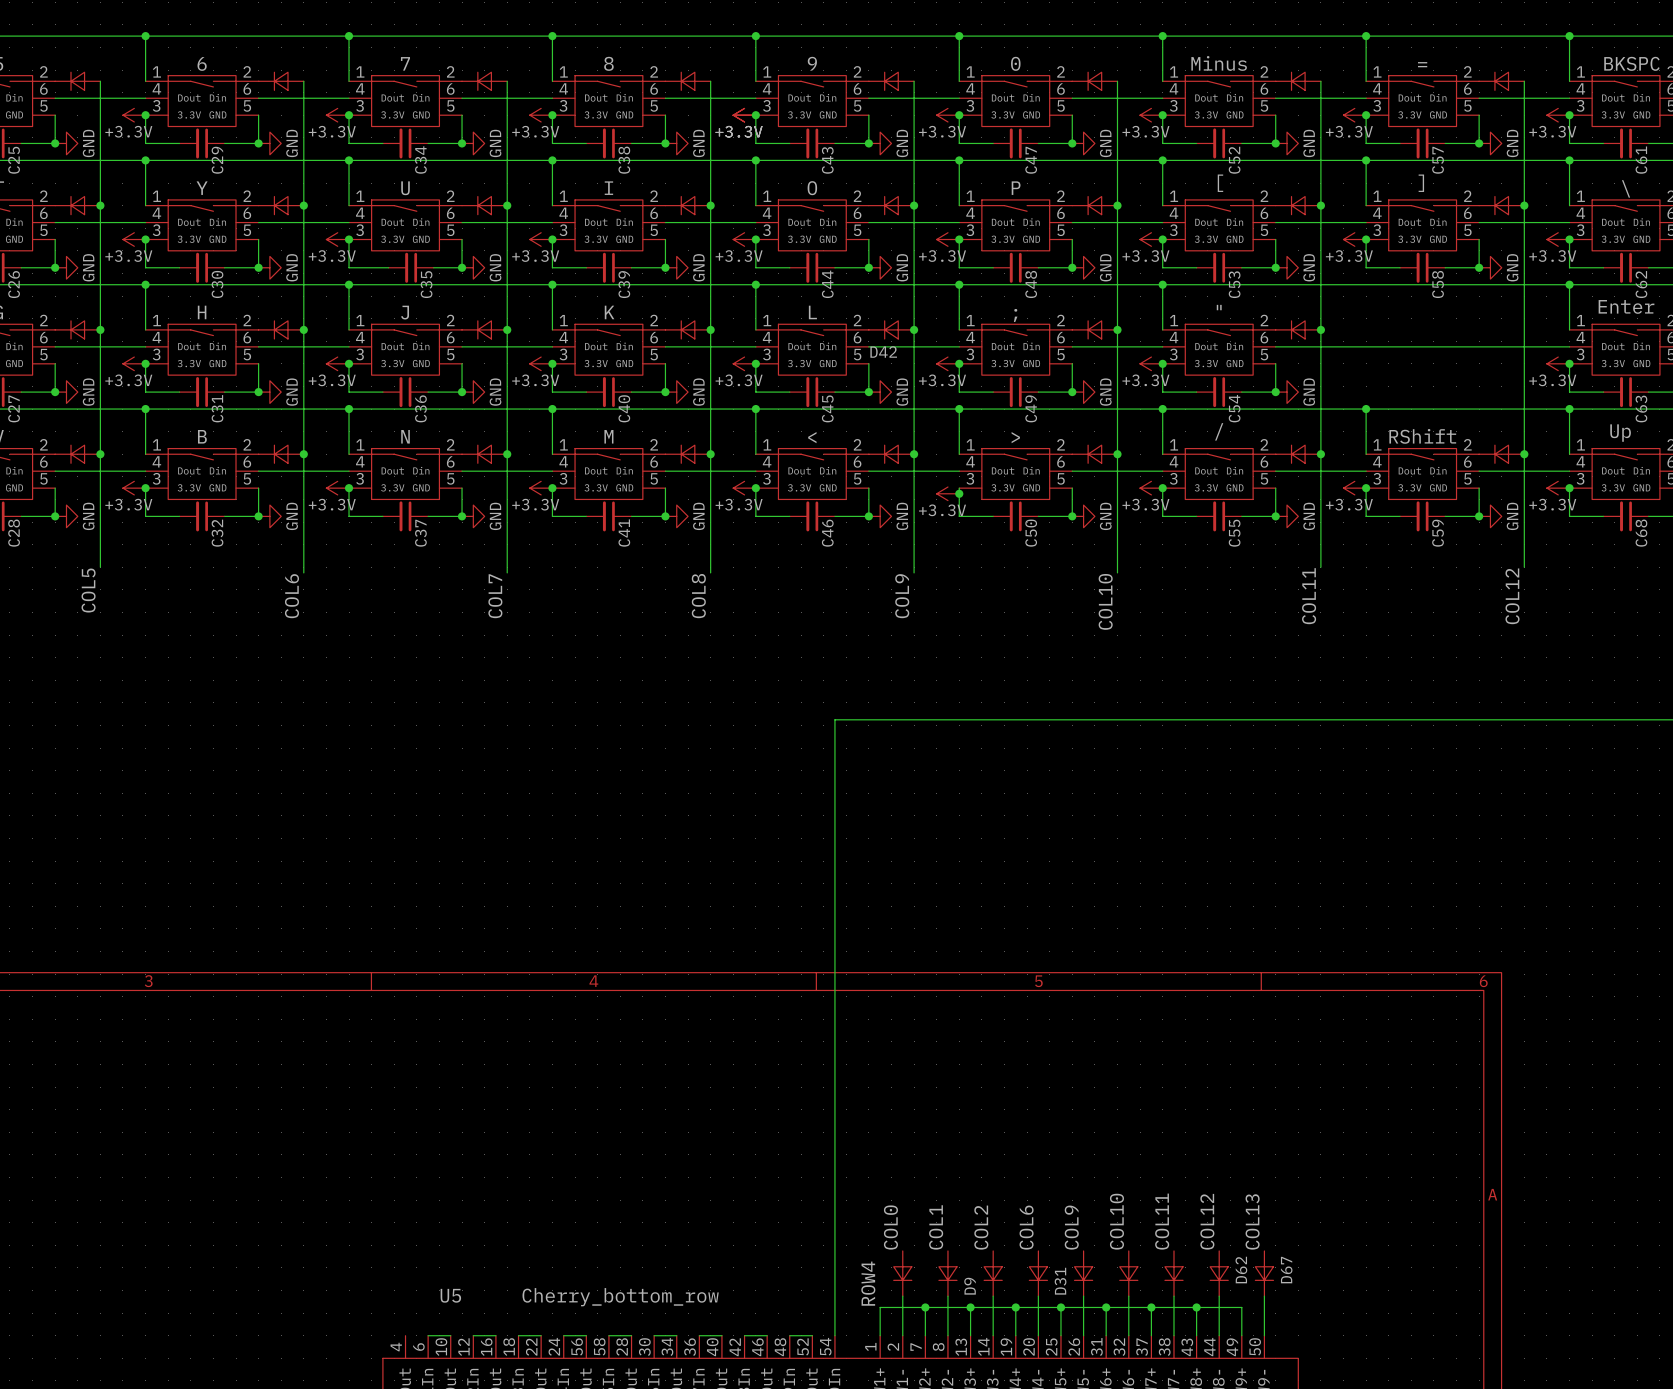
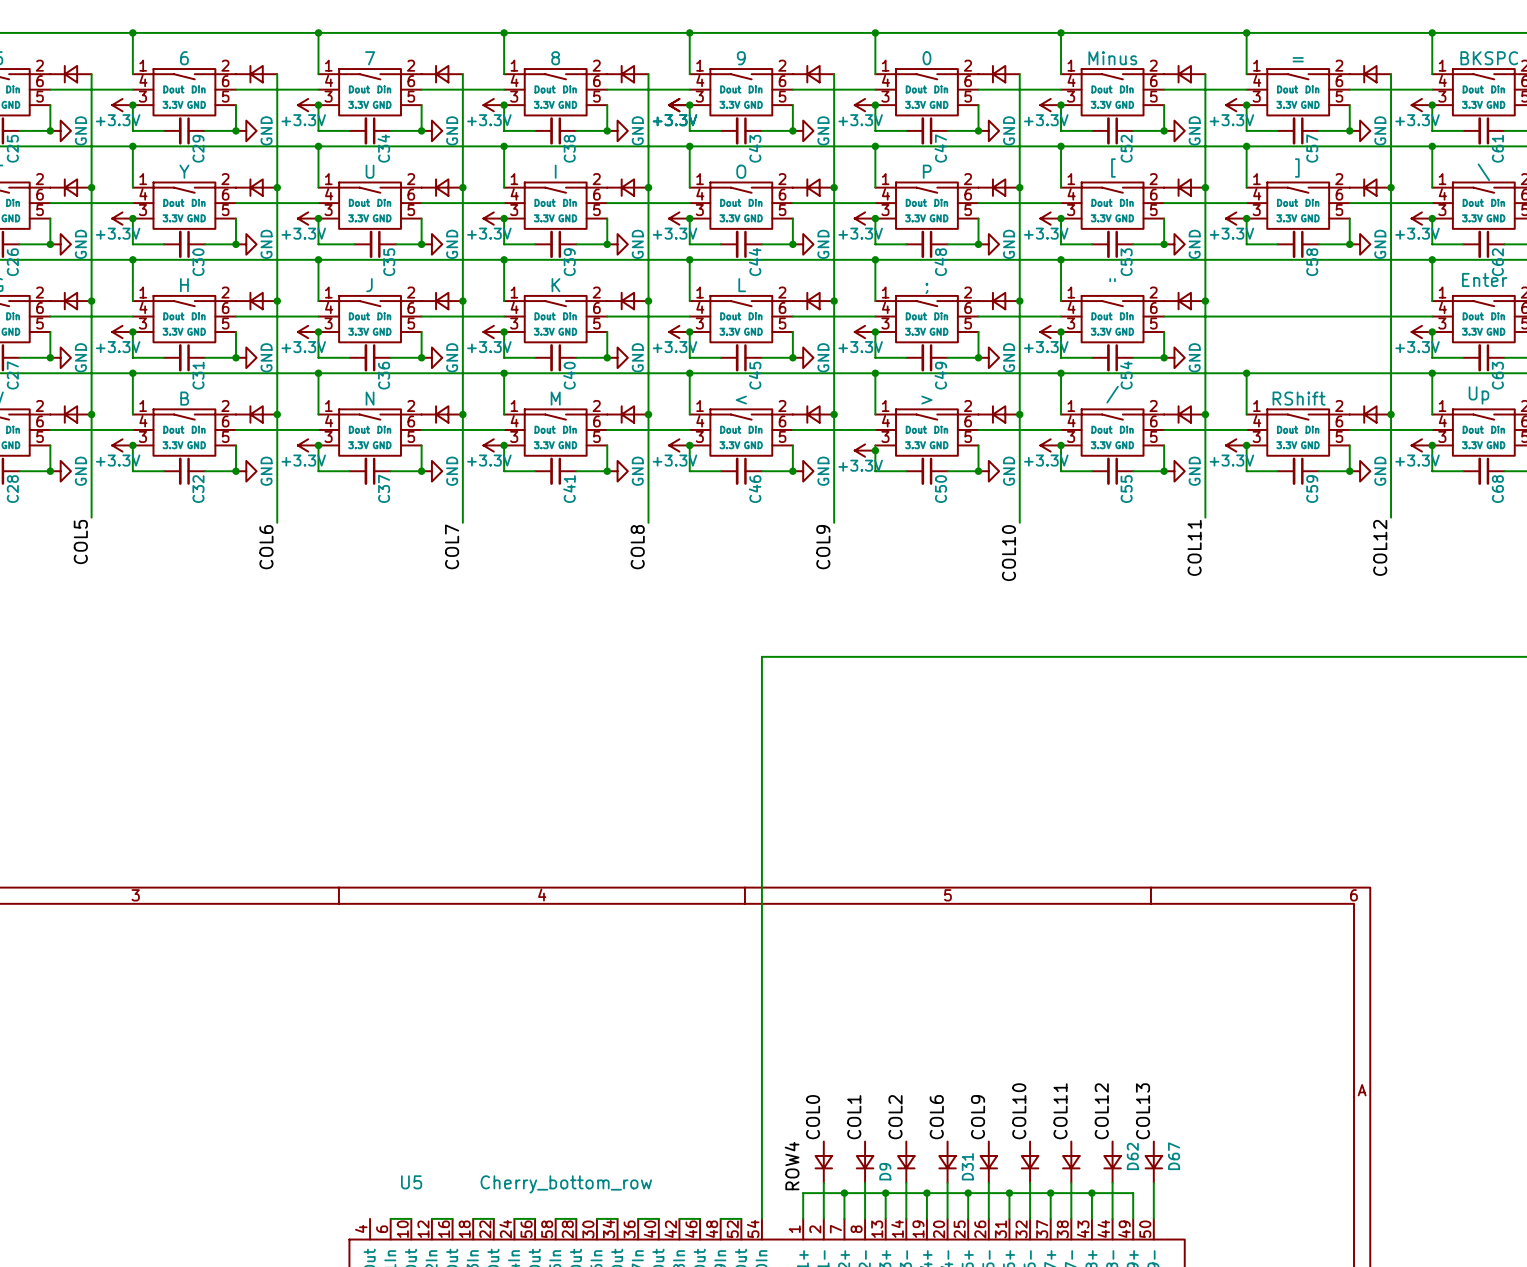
D42 name: D42 (883, 352) -> none

